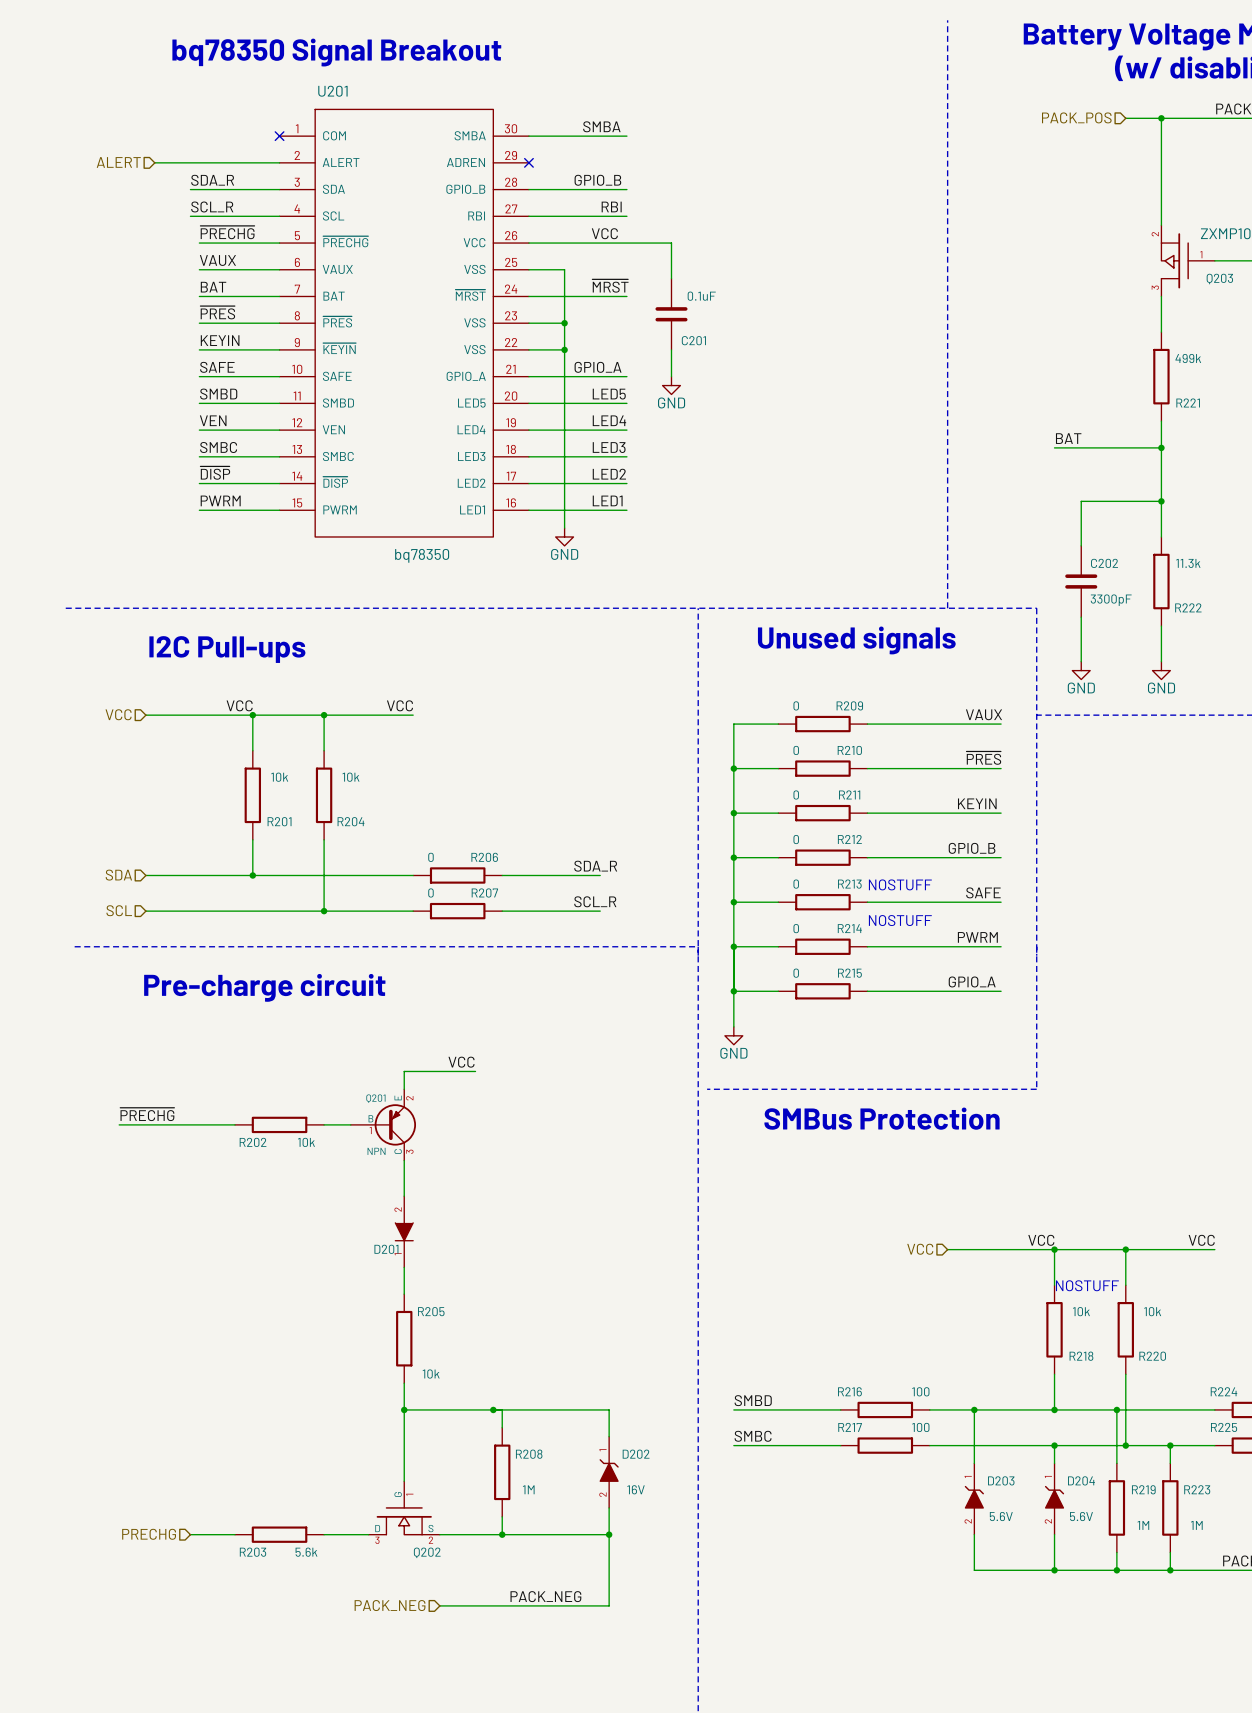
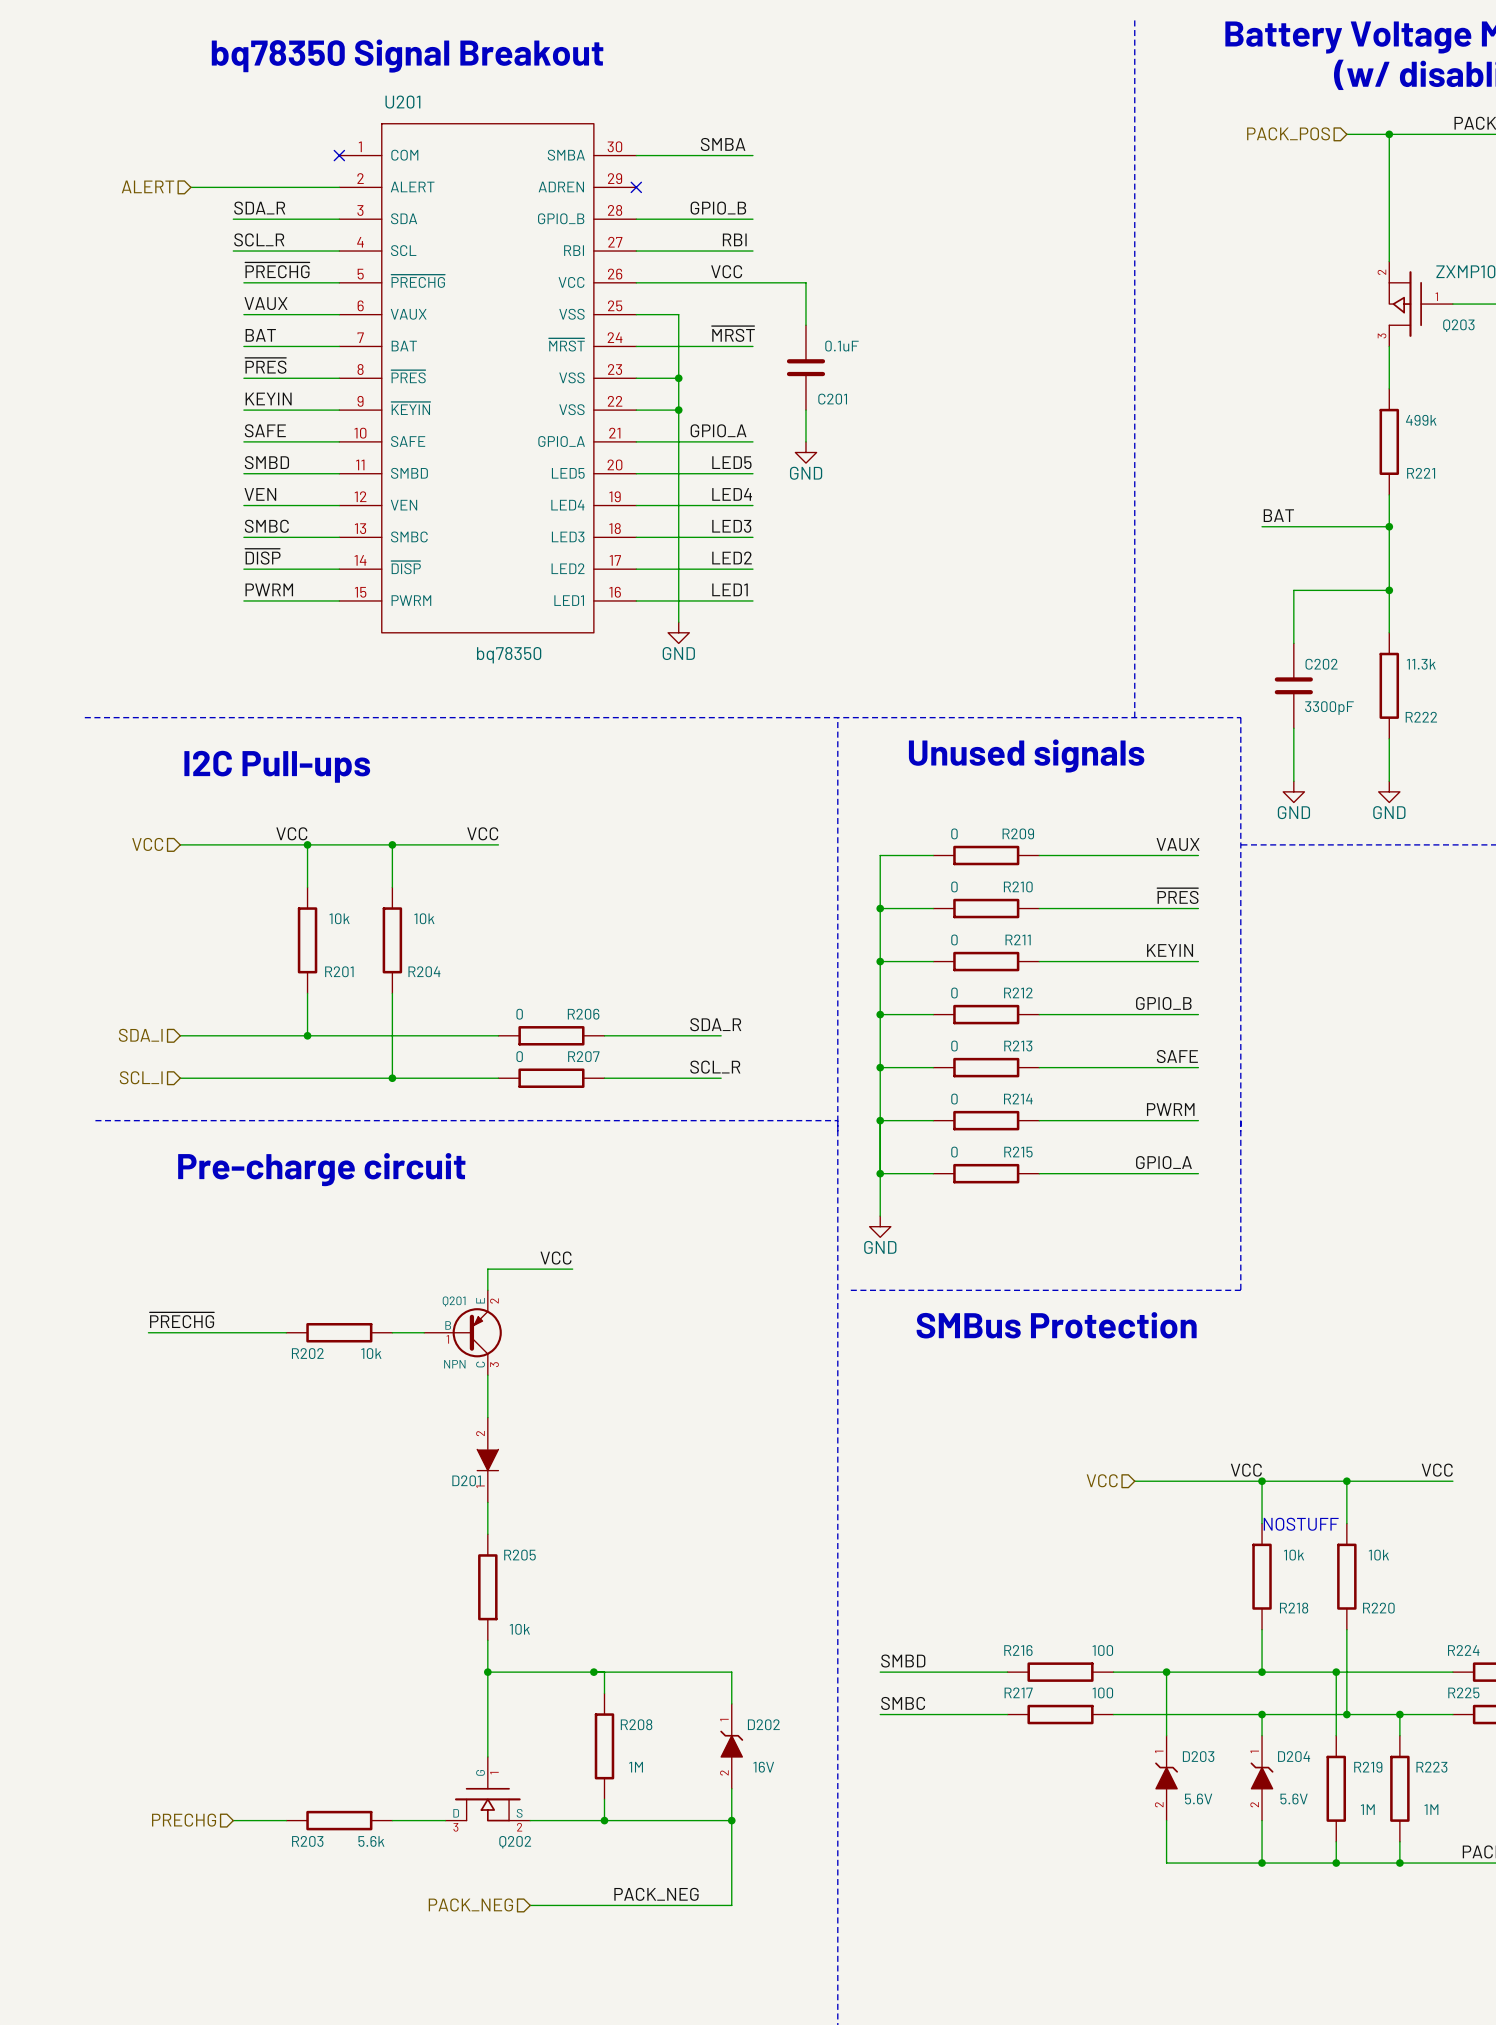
hierarchical label: SDA (118, 875) -> SDA_I (140, 1035)
text: NOSTUFF (900, 884) -> none
hierarchical label: SCL (119, 910) -> SCL_I (141, 1077)
text: NOSTUFF (900, 920) -> none

